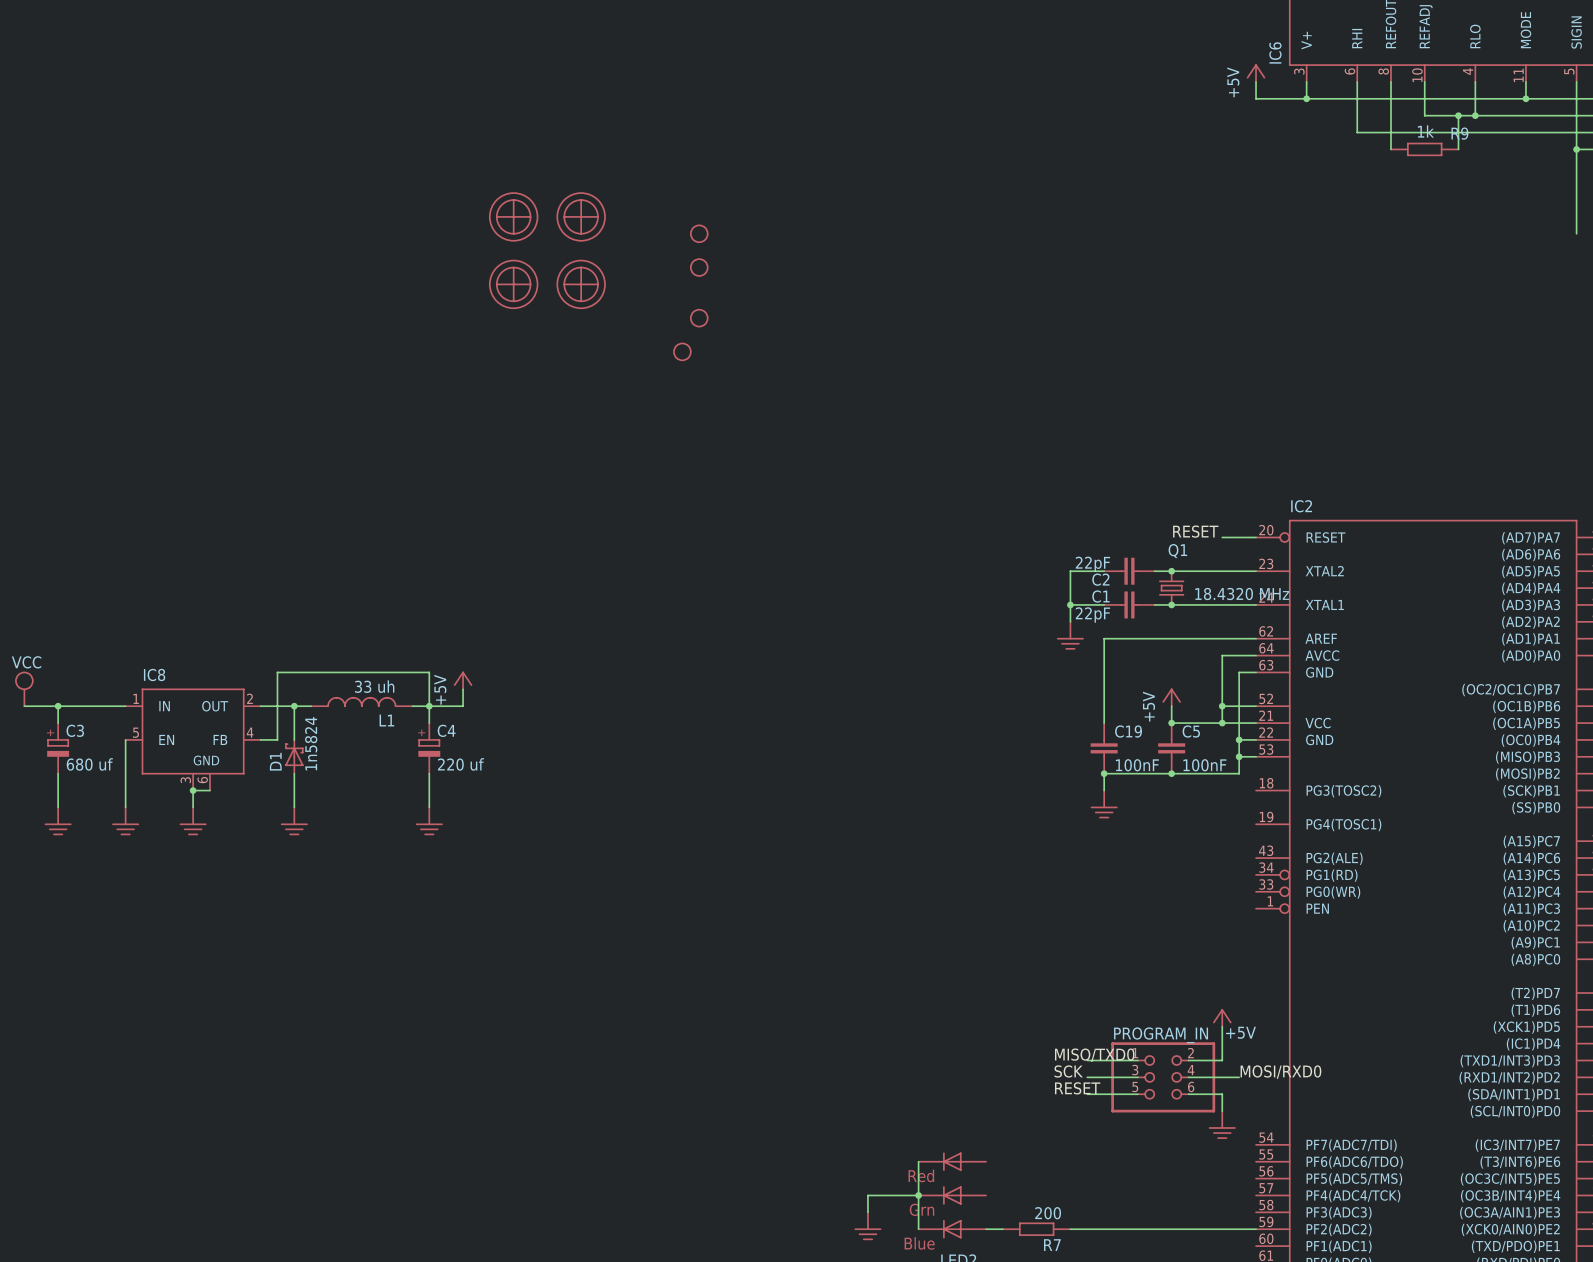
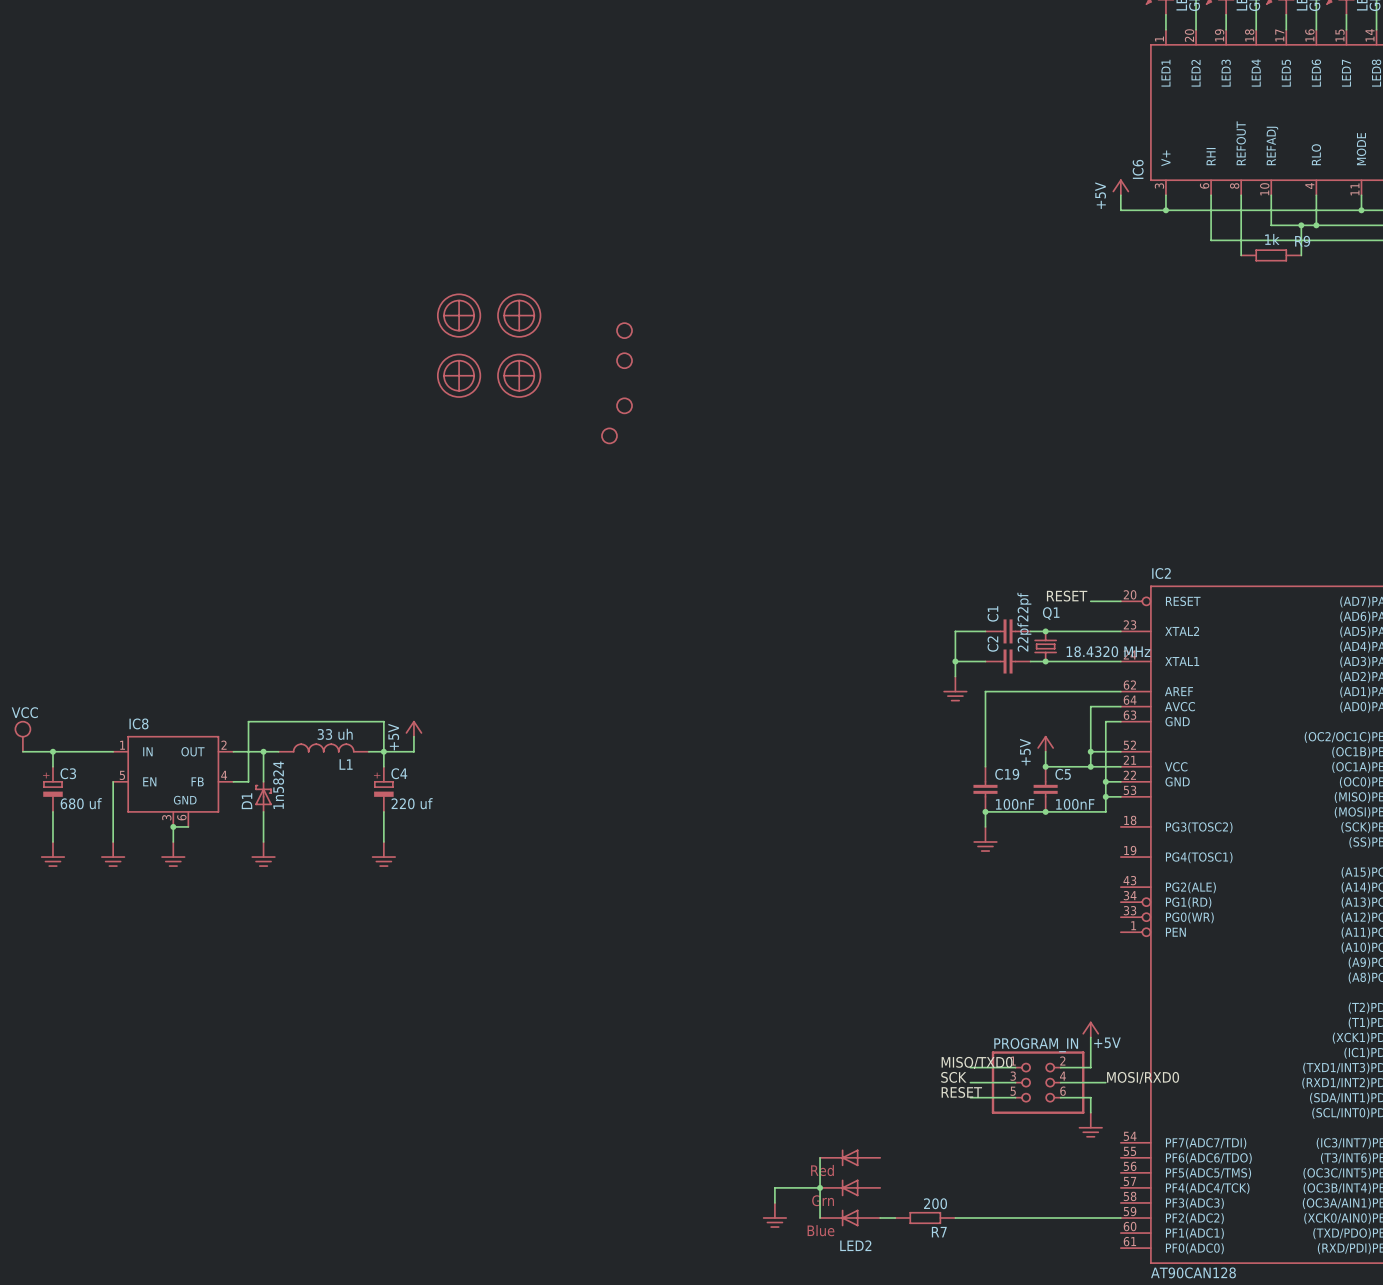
C2 value: 22pF (1092, 564) -> 22pf (1024, 607)
C2 name: C2 (1100, 579) -> C1 (993, 613)
C1 name: C1 (1100, 596) -> C2 (993, 644)
C1 value: 22pF (1092, 614) -> 22pf (1024, 637)

